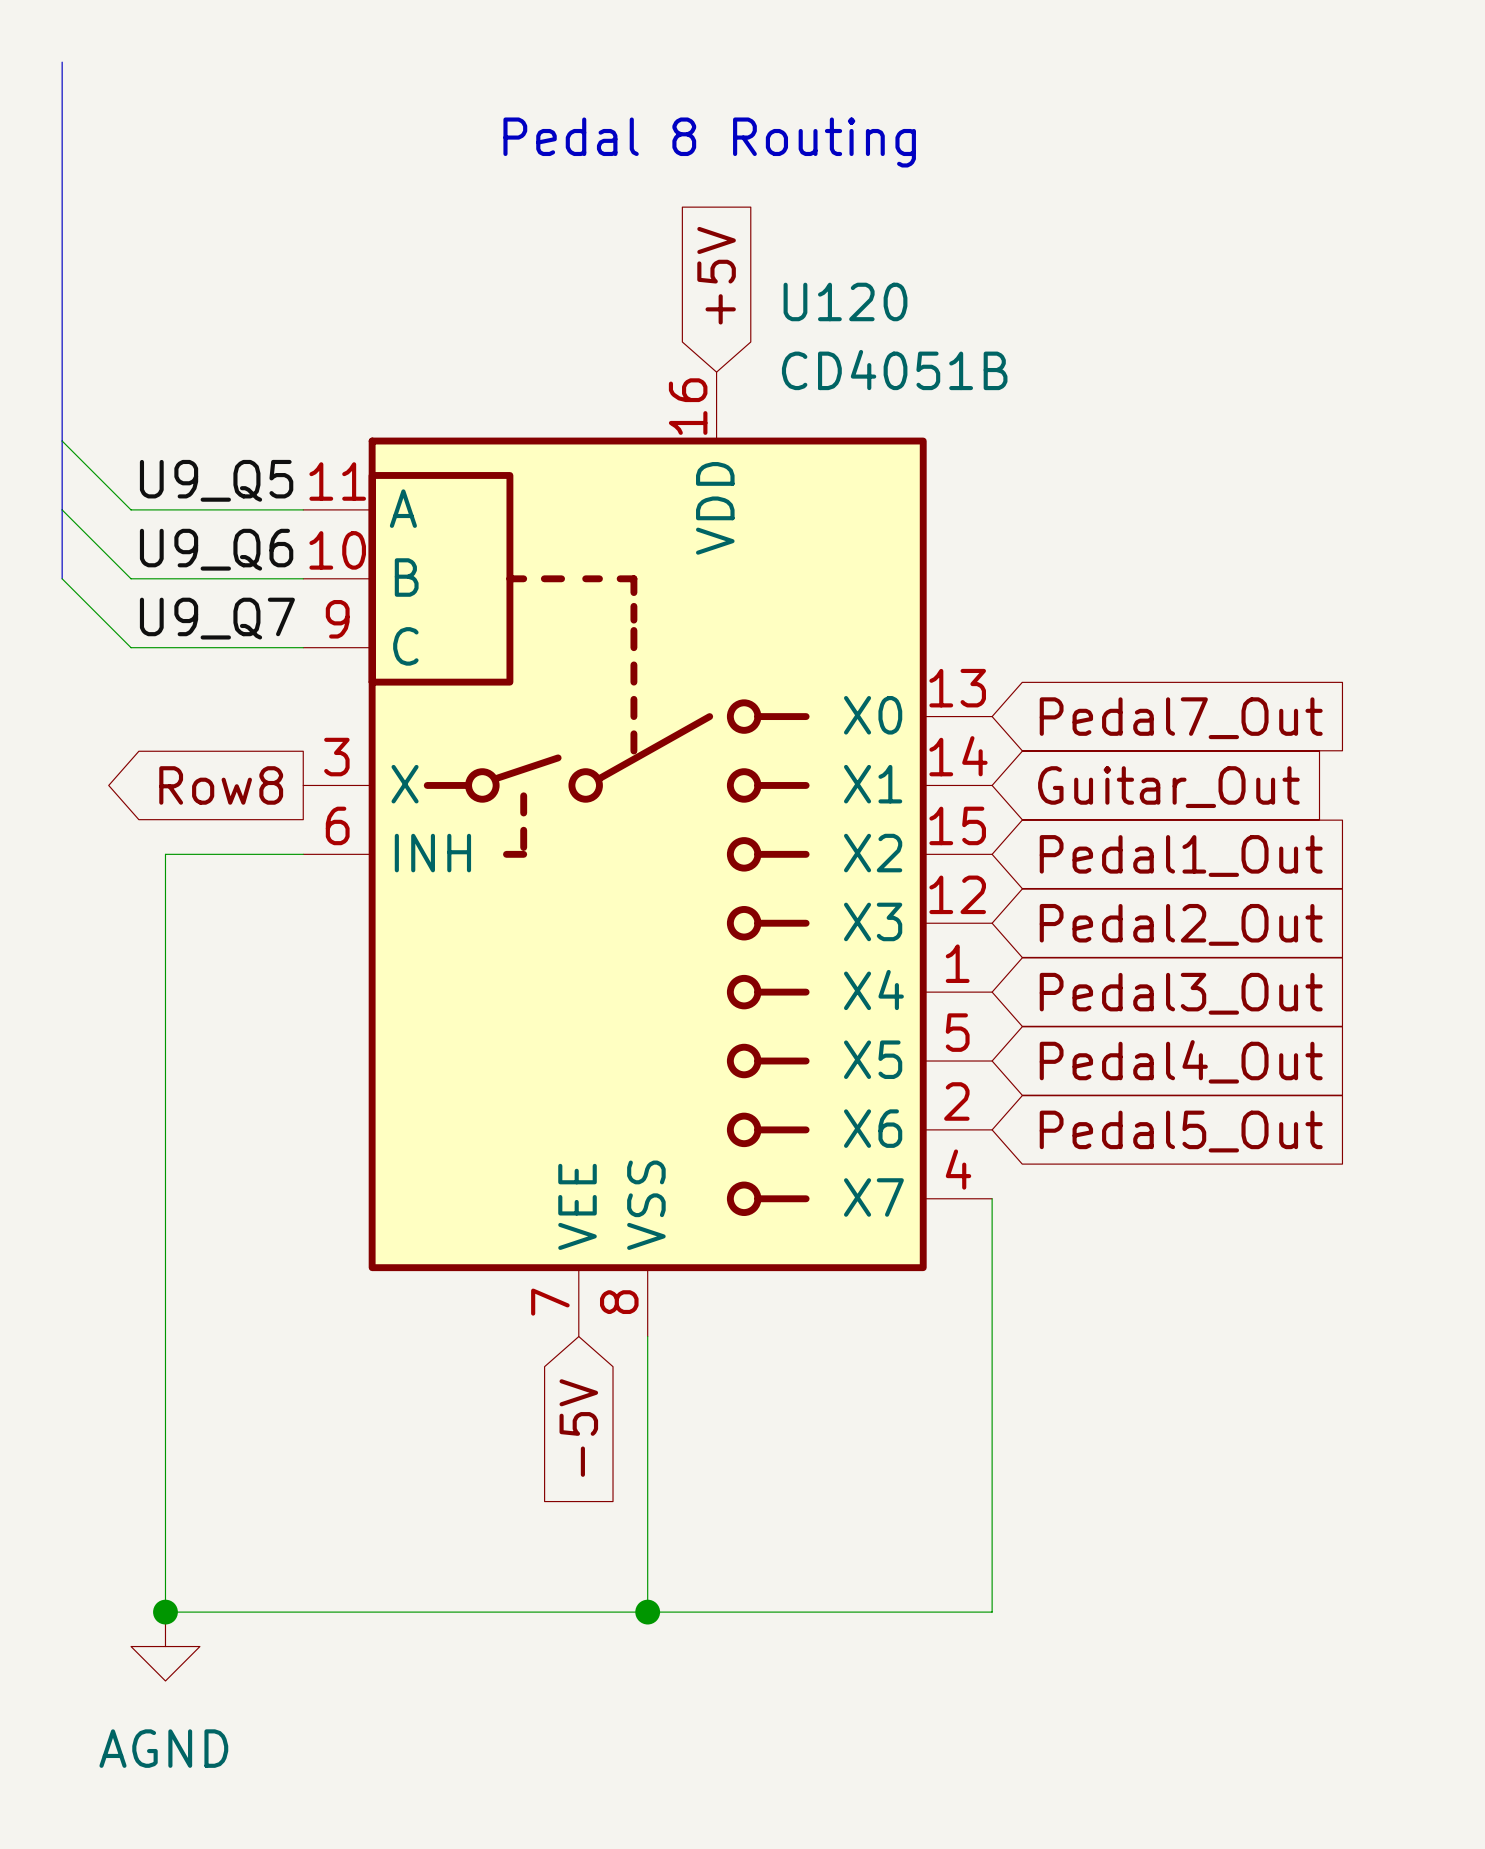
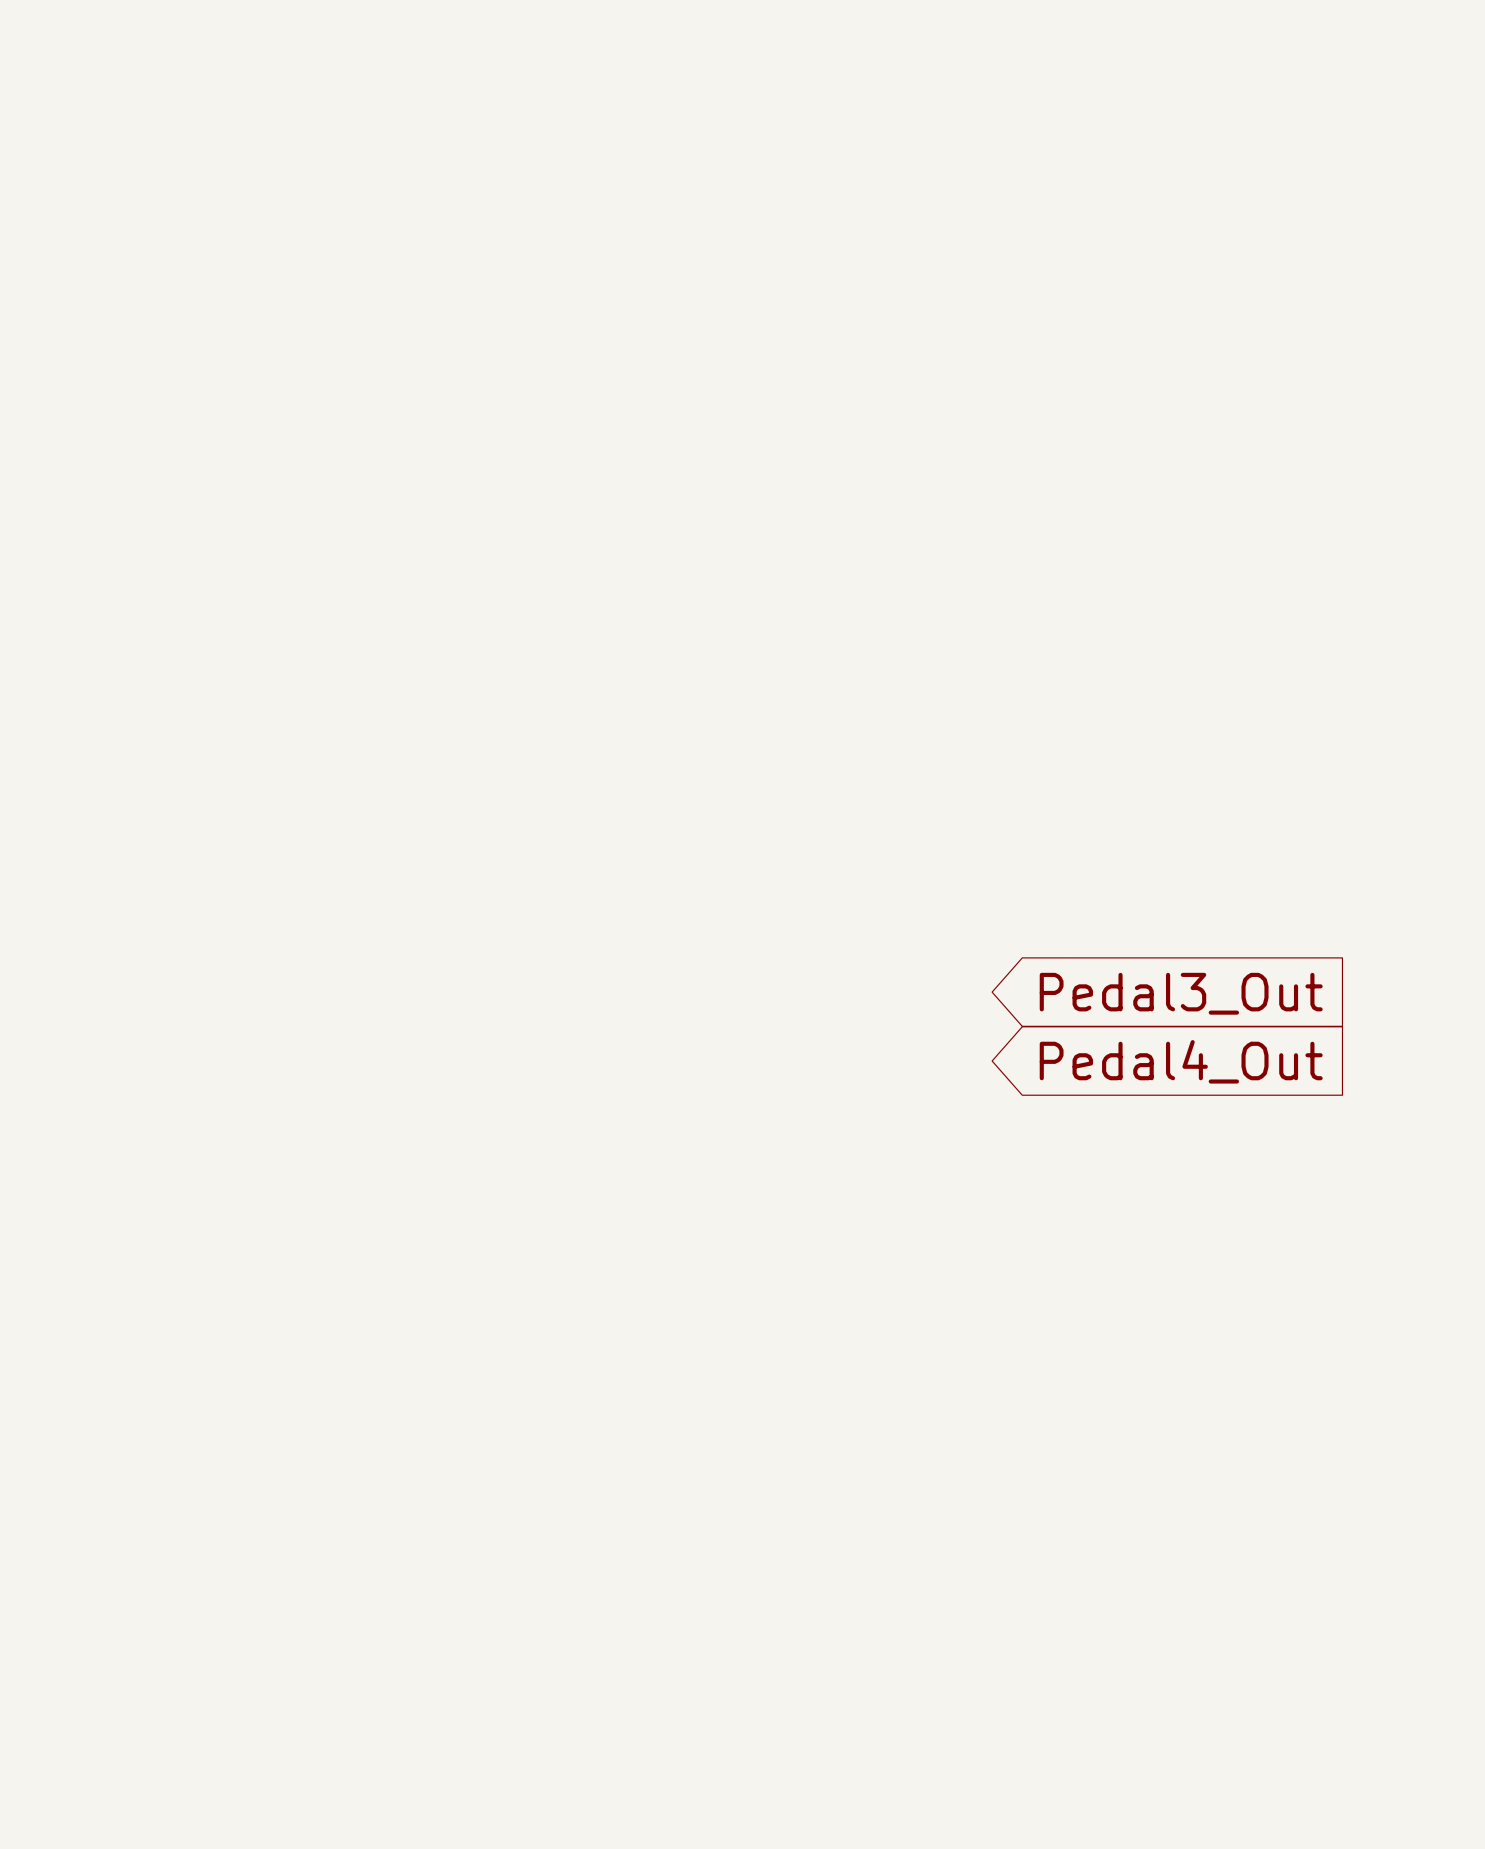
bus: (62, 62) (62, 578) -> none
text: Pedal 8 Routing (709, 142) -> none
global label: +5V (716, 275) -> none
wire: (62, 441) (131, 509) (303, 509) -> none
label: U9_Q5 (216, 480) -> none
wire: (62, 509) (131, 578) (303, 578) -> none
label: U9_Q6 (216, 549) -> none
wire: (62, 578) (131, 647) (303, 647) -> none
label: U9_Q7 (217, 618) -> none
global label: Pedal7_Out (1181, 718) -> none
global label: Row8 (221, 785) -> none
global label: Guitar_Out (1168, 787) -> none
wire: (303, 854) (165, 854) (165, 1612) (992, 1612) (992, 1198) -> none
U120: CD4051B (647, 854) -> none
global label: Pedal1_Out (1181, 855) -> none
global label: Pedal2_Out (1181, 924) -> none
global label: Pedal5_Out (1181, 1131) -> none
wire: (647, 1336) (647, 1612) -> none
global label: -5V (578, 1428) -> none
junction: (165, 1612) -> none
junction: (647, 1612) -> none
power symbol: AGND (165, 1646) -> none

